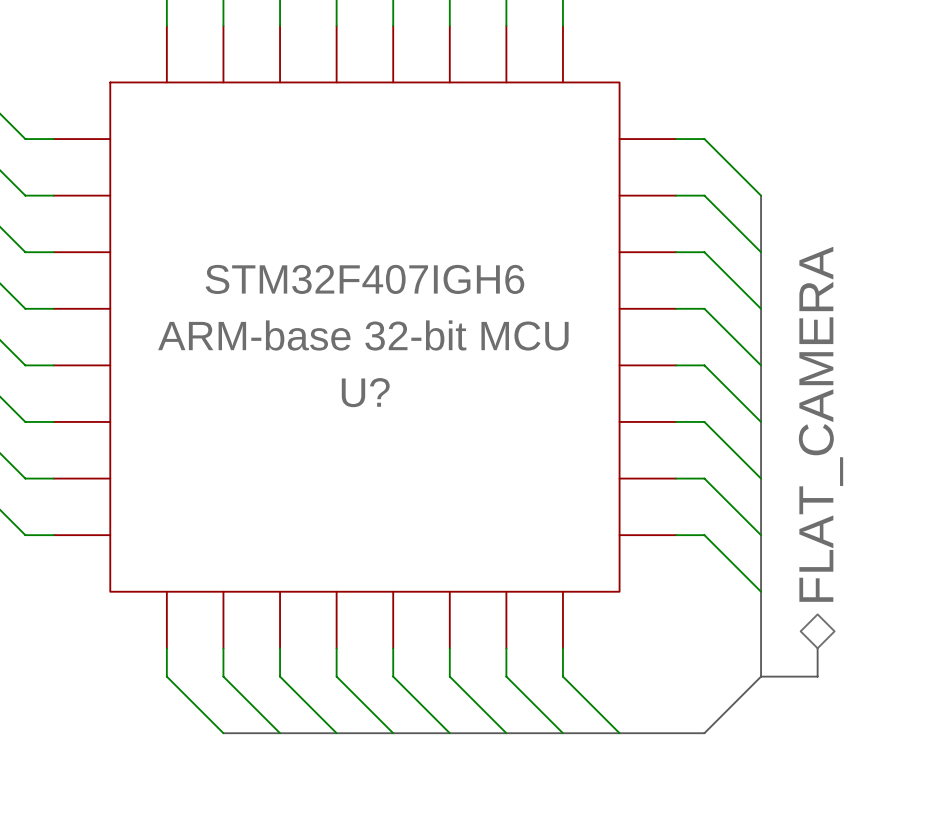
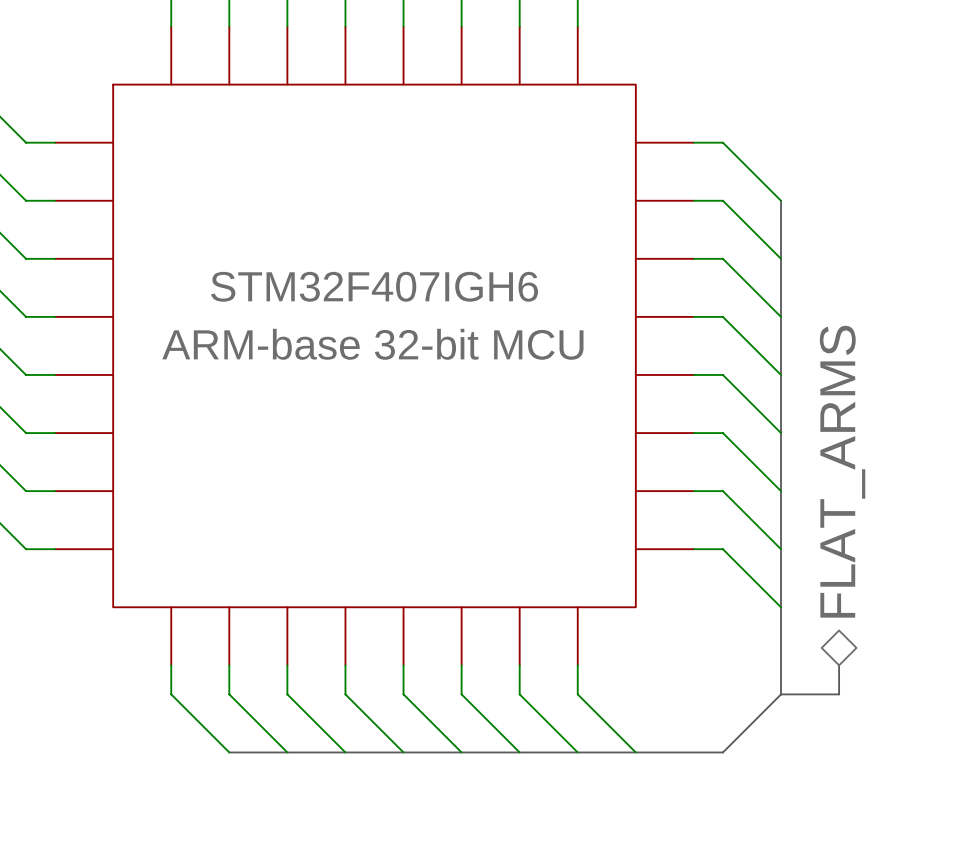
U? name: U? (365, 392) -> none
hierarchical label: FLAT_CAMERA (821, 424) -> FLAT_ARMS (842, 471)

